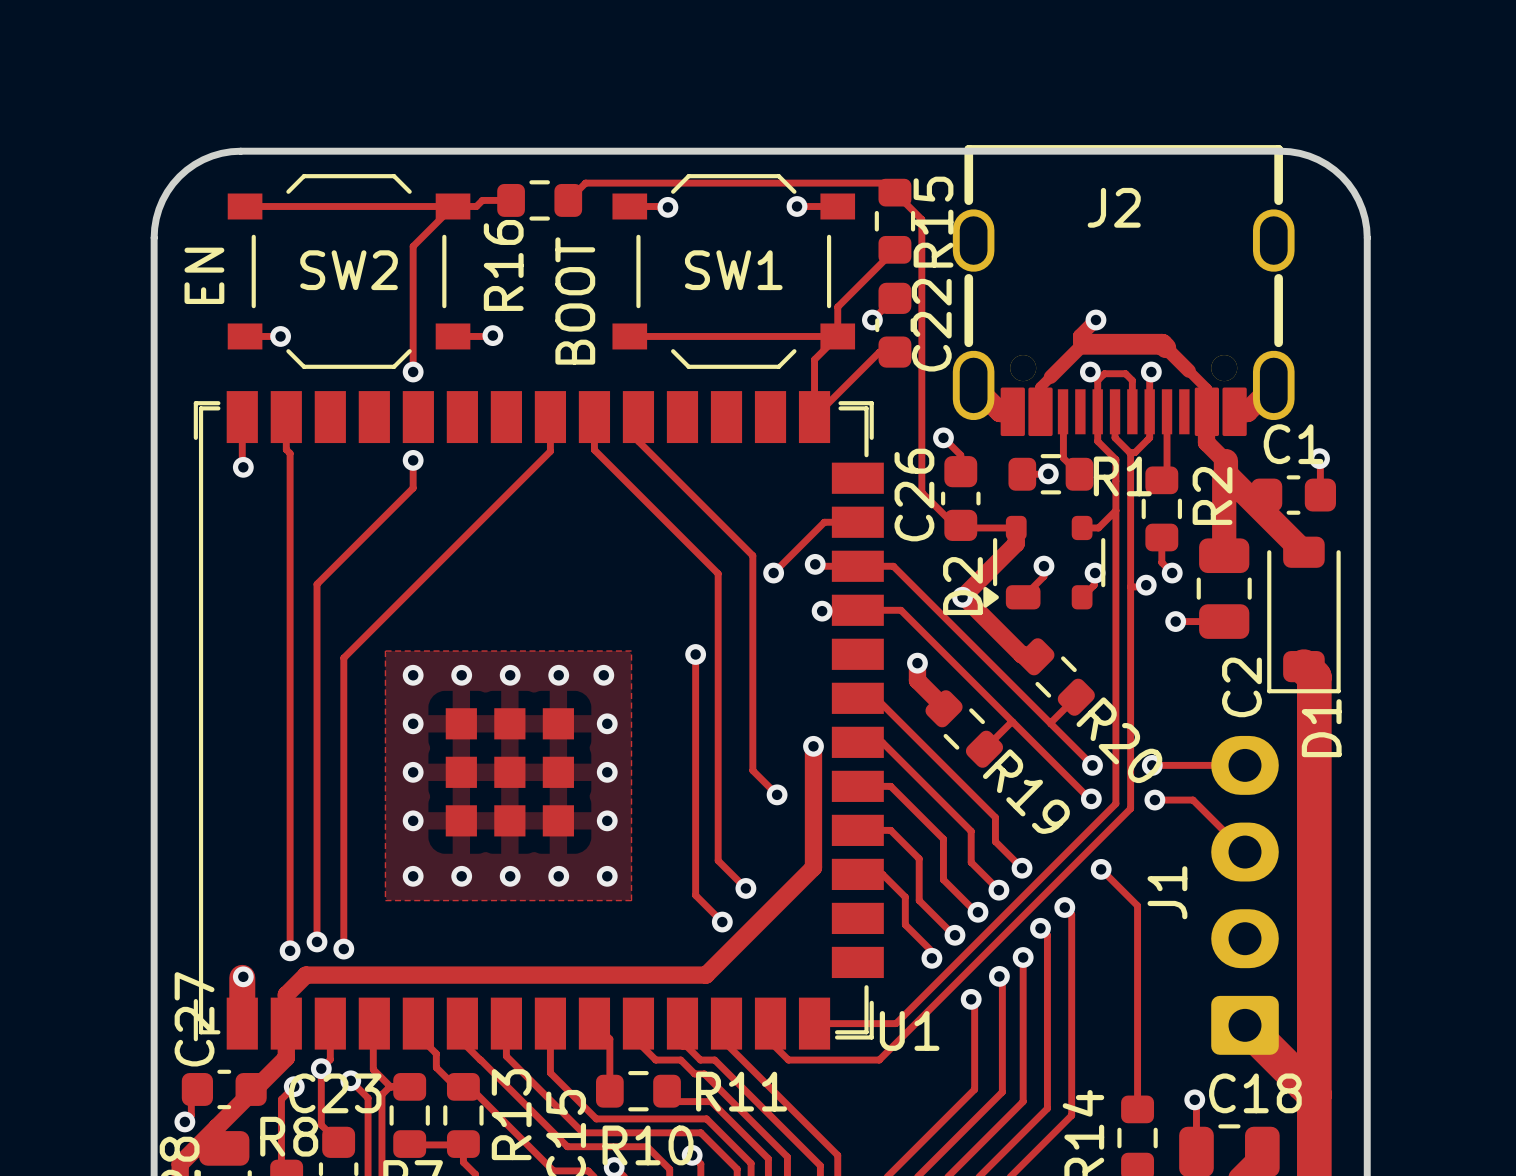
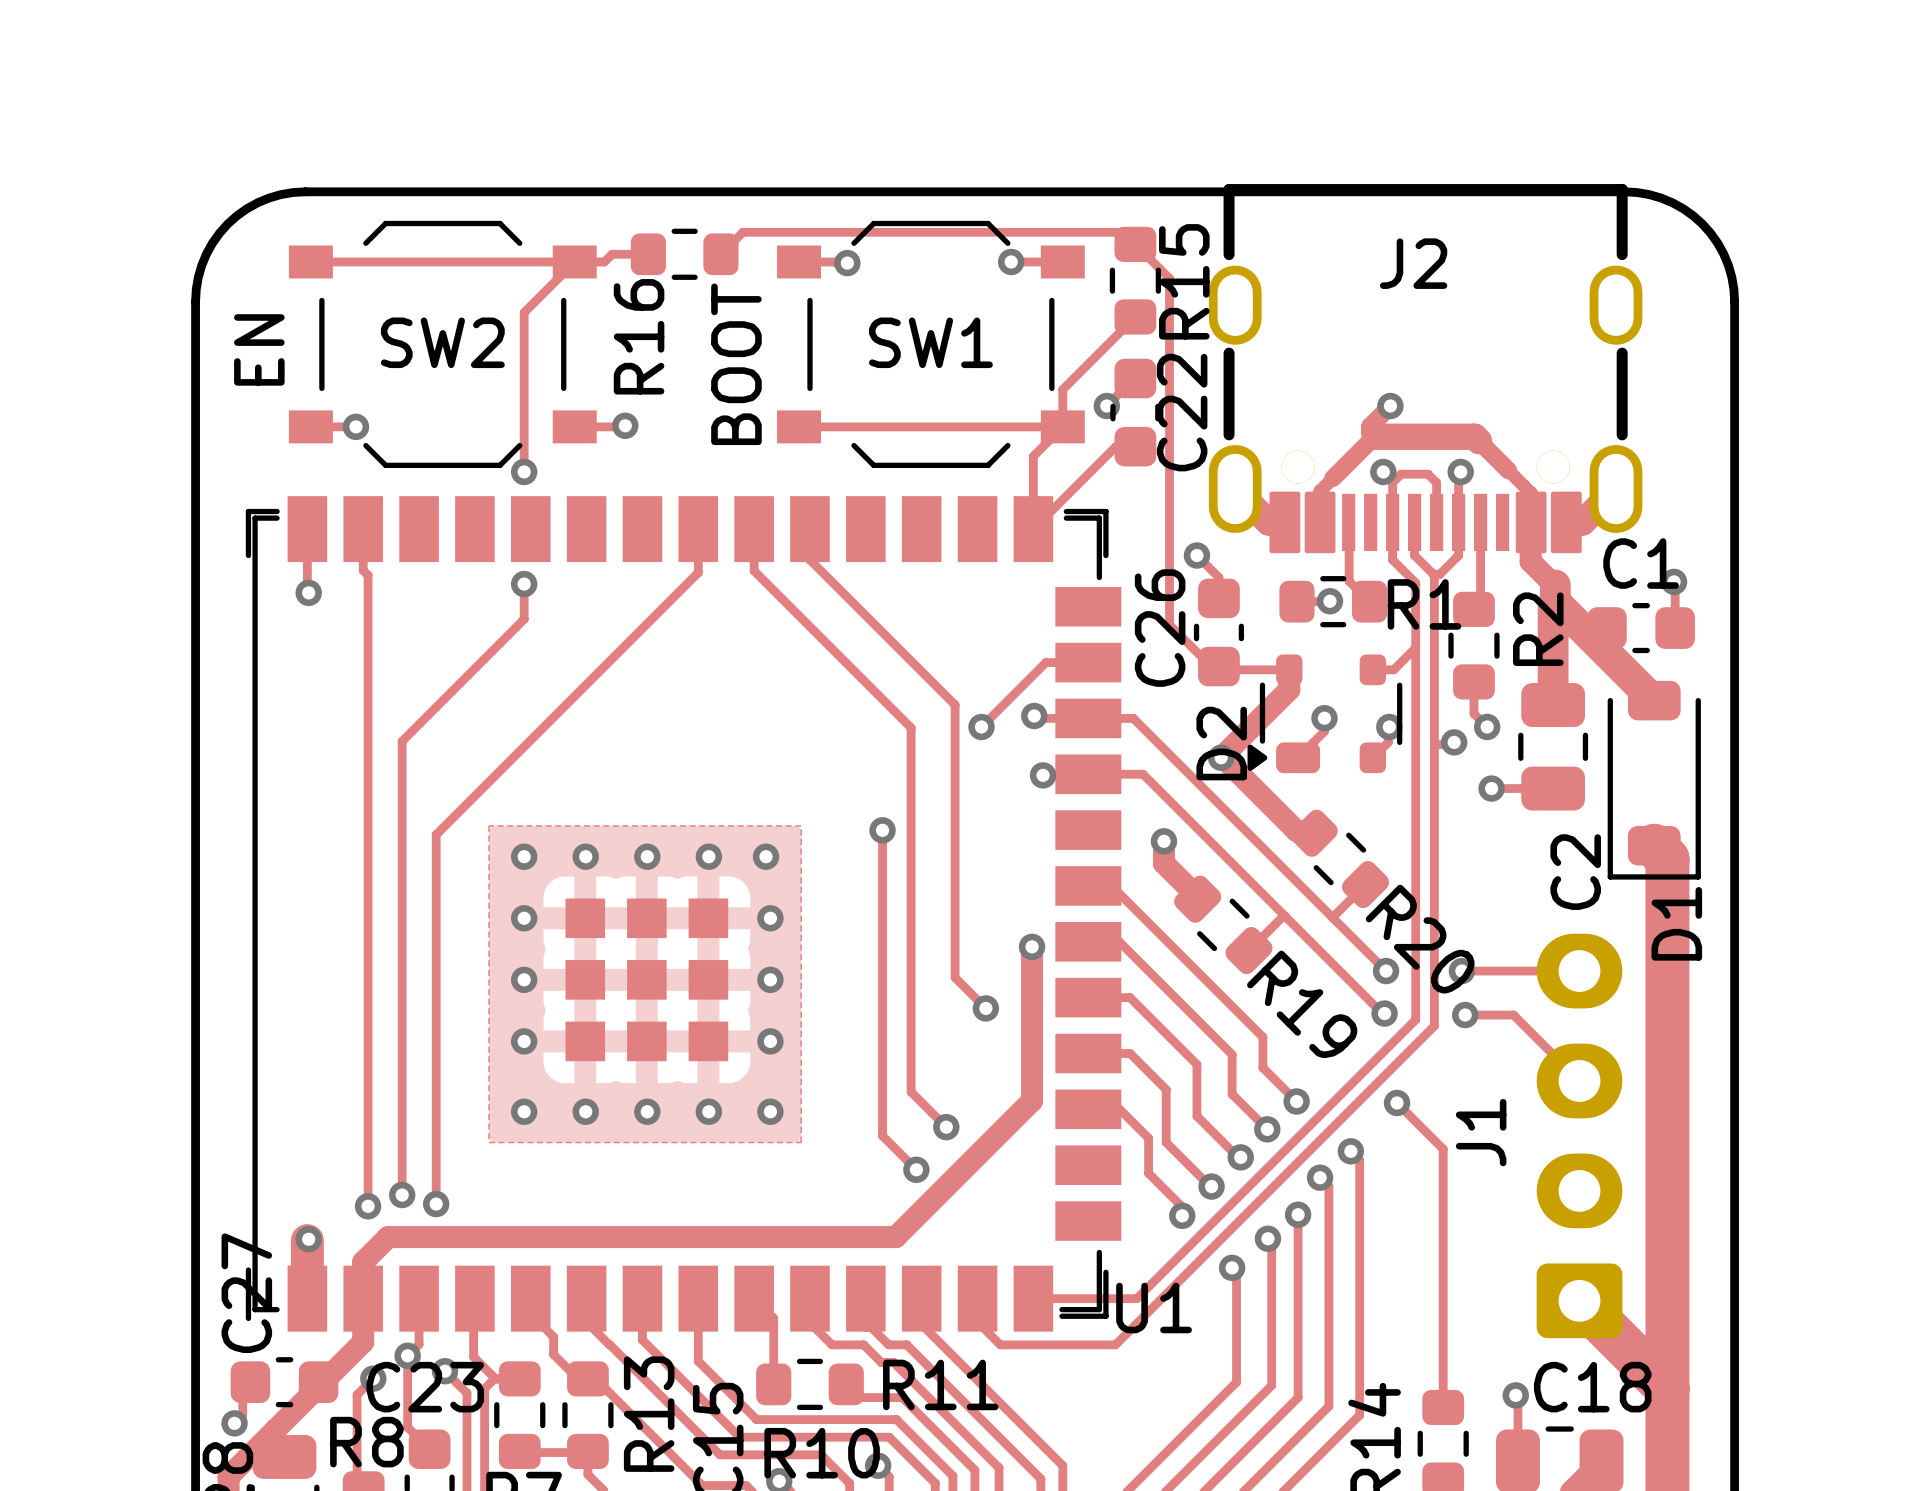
text position: BOOT (575, 300) -> BOOT (736, 364)

